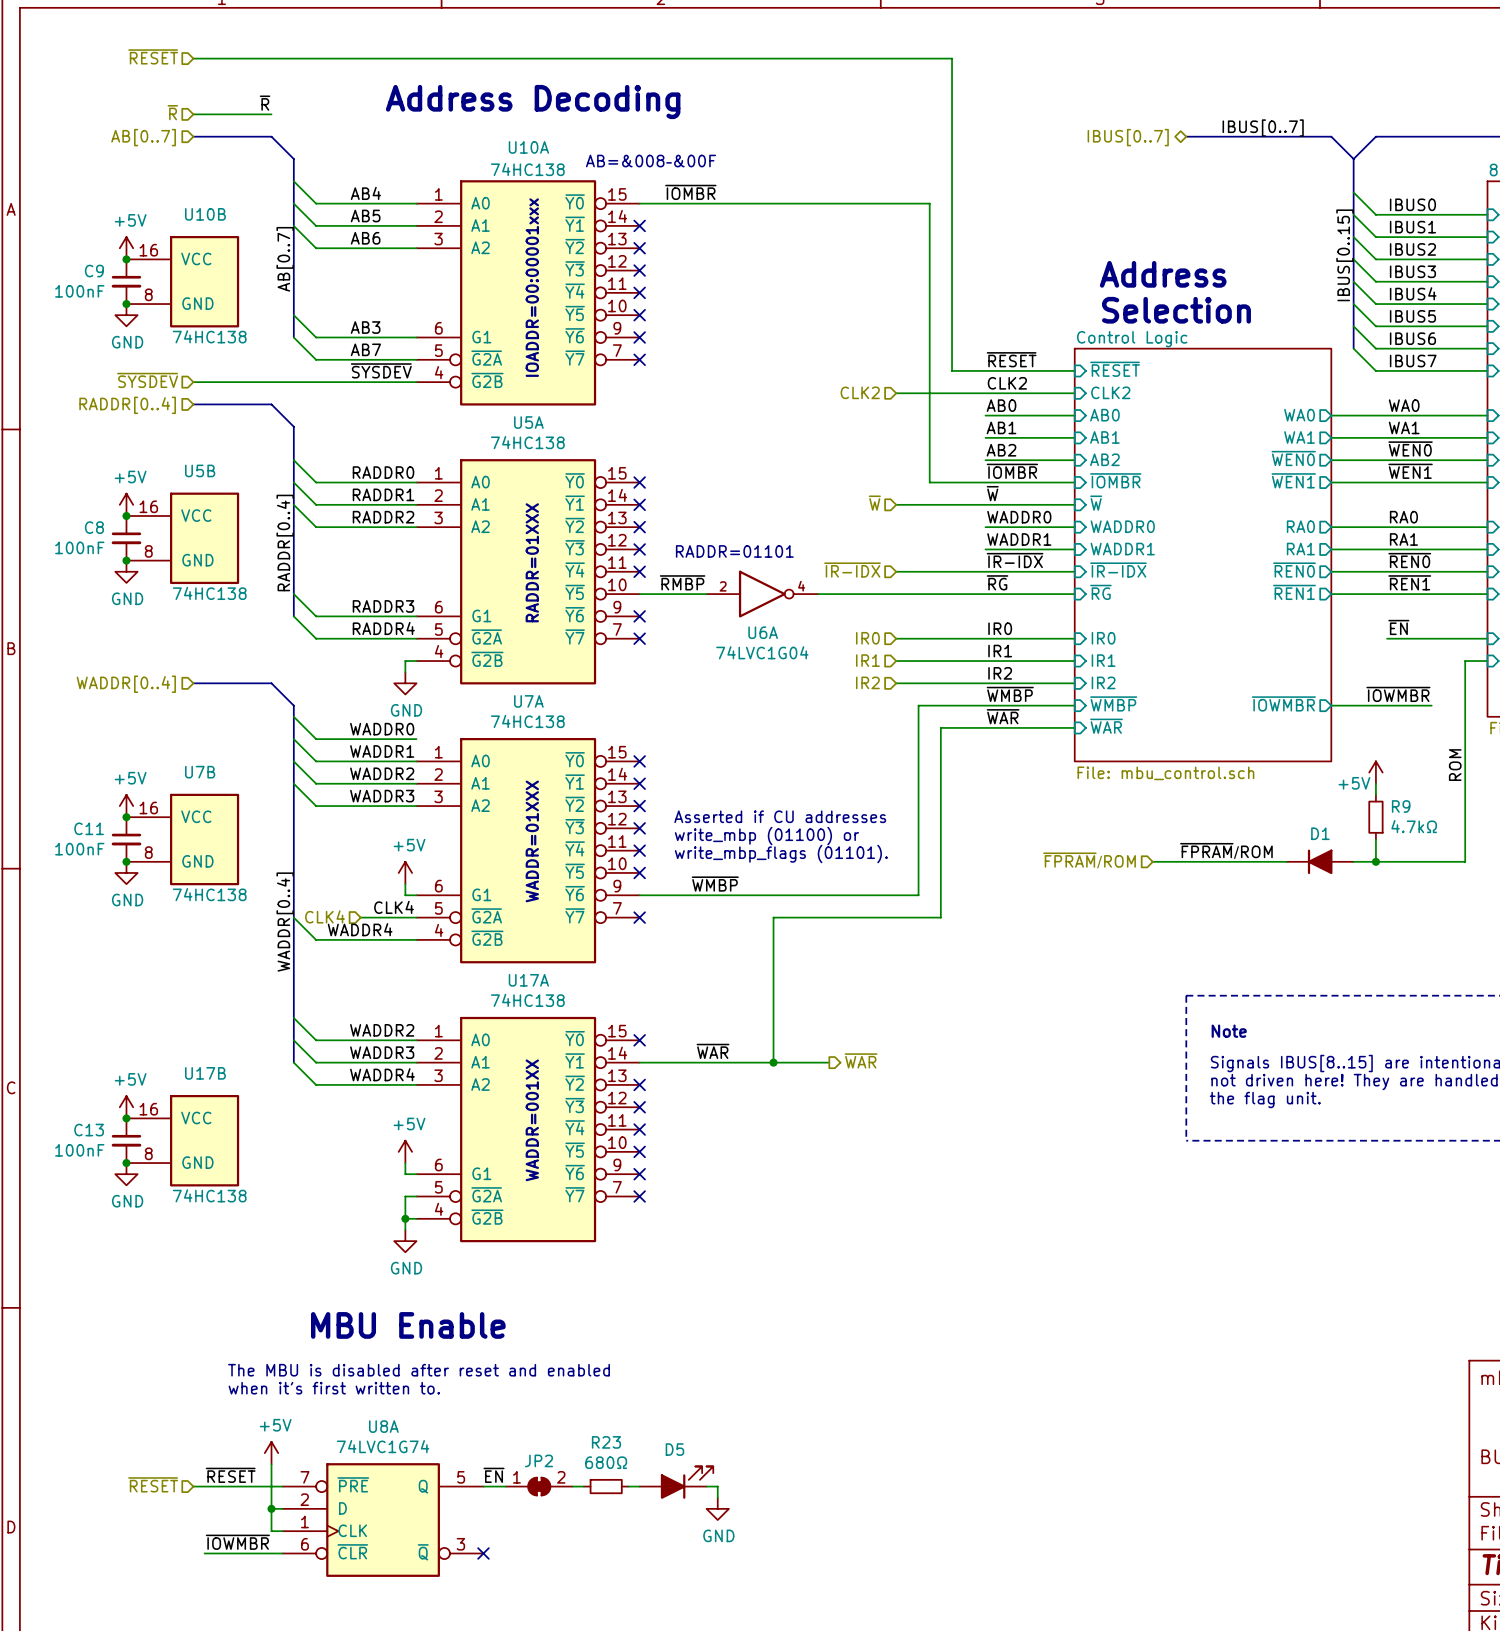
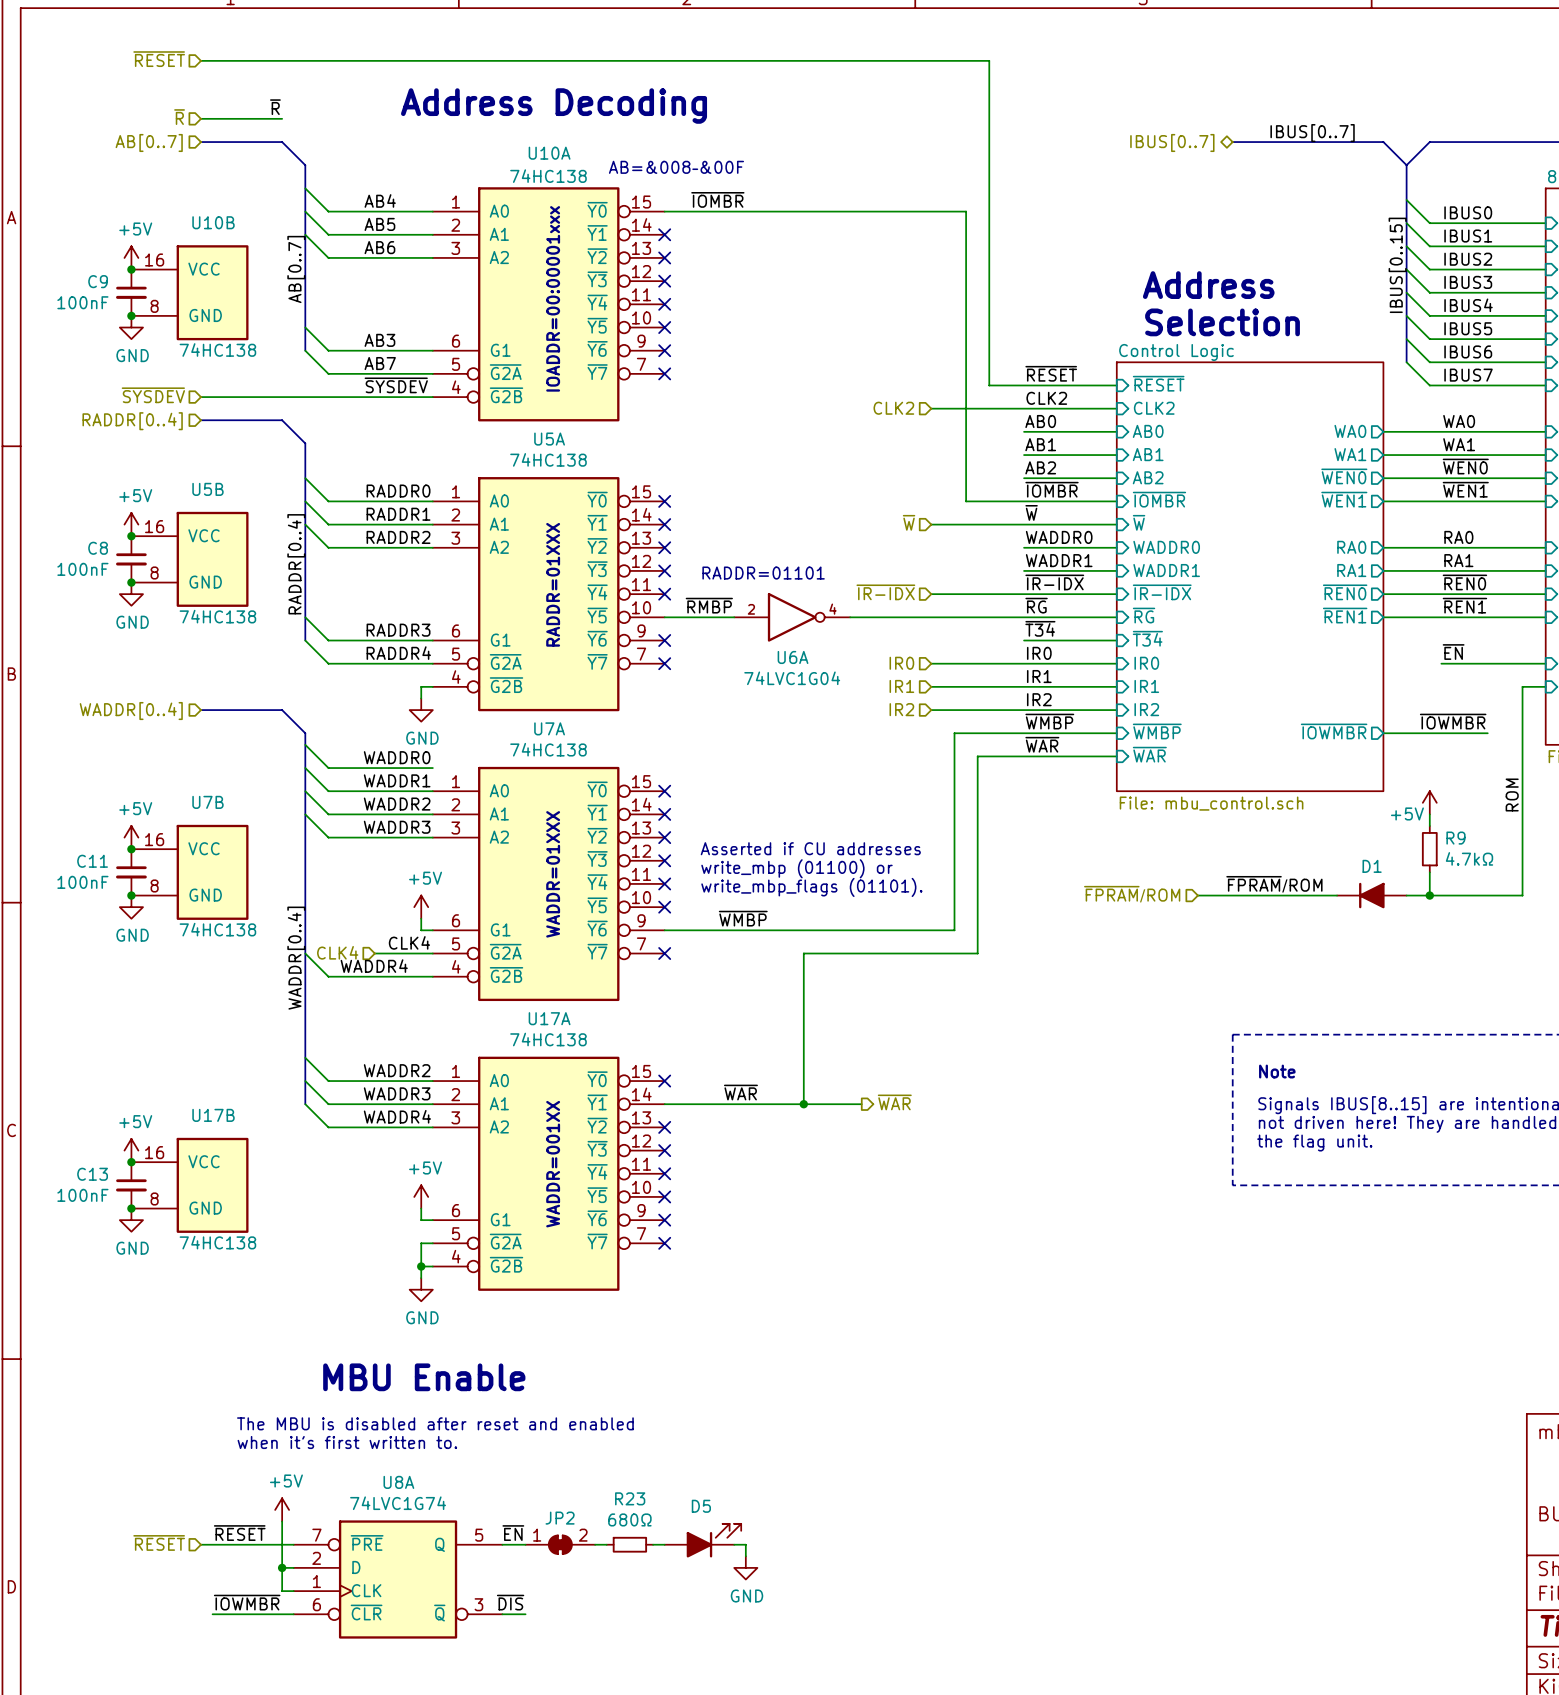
label: none -> ~{T34} (1040, 628)
sheet pin: none -> ~{T34} (1147, 638)
wire: none -> (1024, 640) (1116, 640)
label: none -> ~{DIS} (510, 1602)
wire: none -> (502, 1614) (525, 1614)
no-connect mark: (483, 1553) -> none

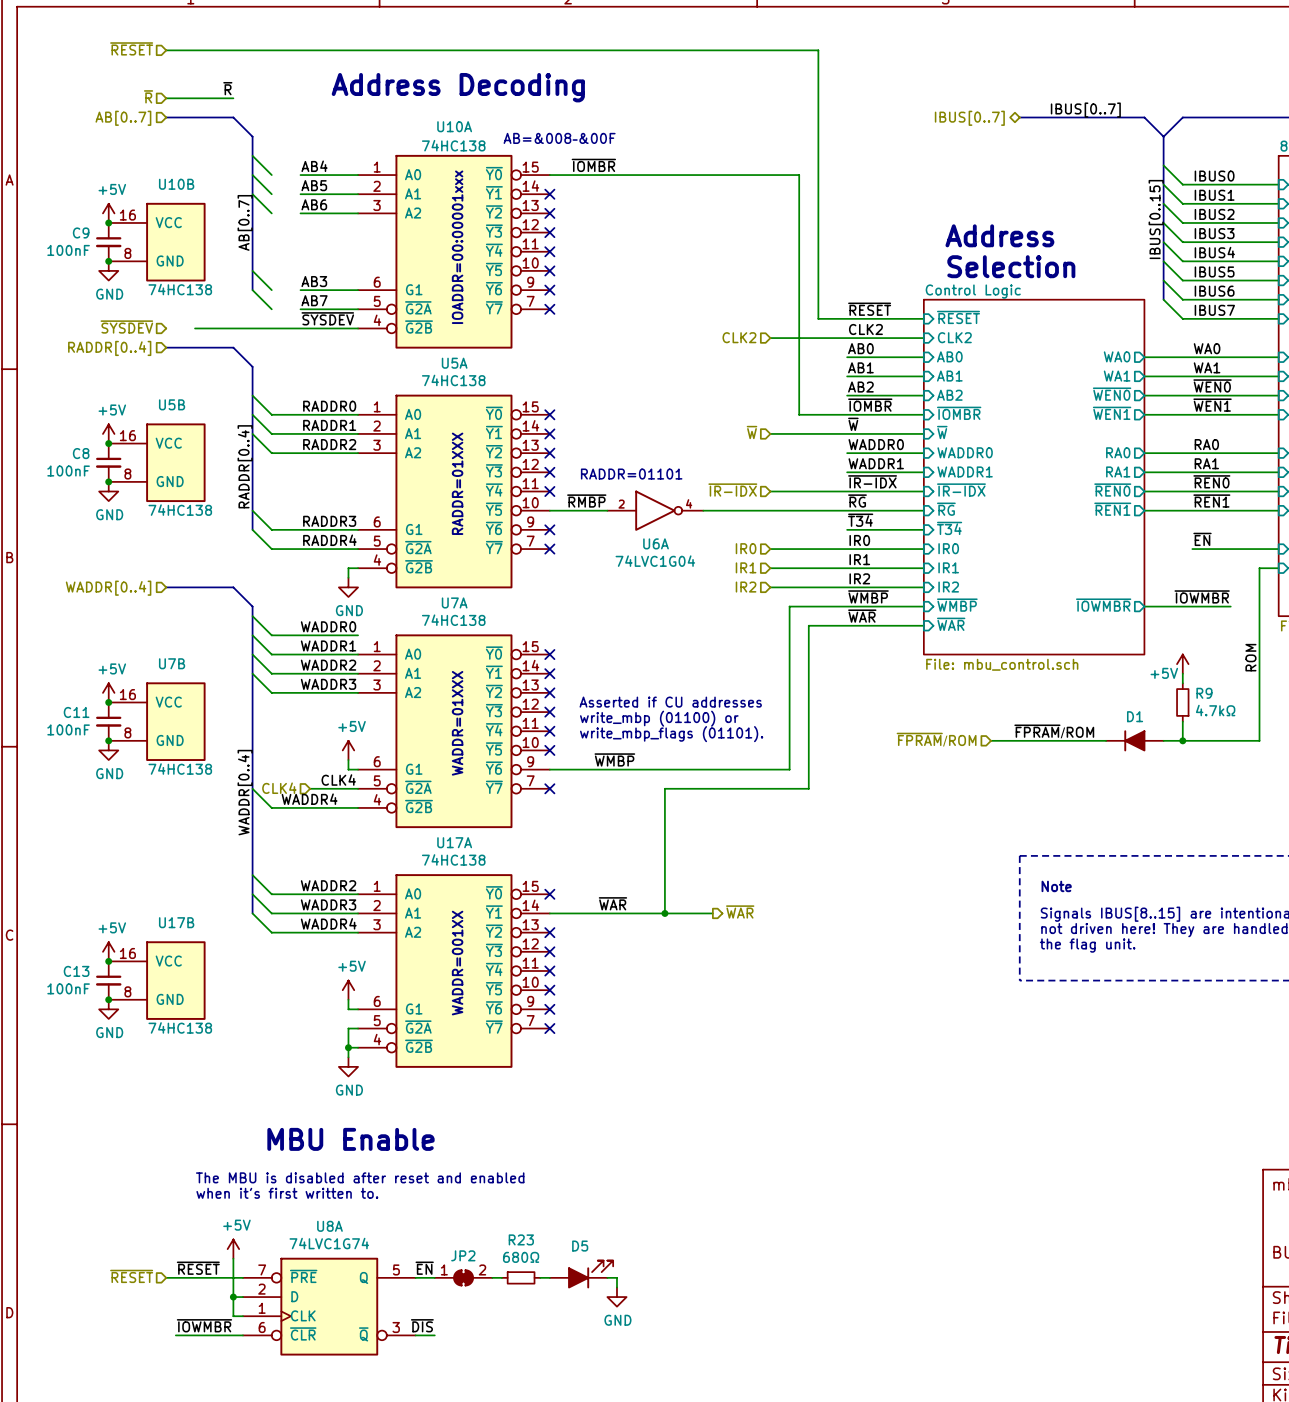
wire: (328, 211) (363, 211) -> none
wire: (328, 234) (363, 234) -> none
wire: (328, 257) (363, 257) -> none
wire: (328, 350) (363, 350) -> none
wire: (328, 373) (363, 373) -> none
wire: (200, 397) (235, 397) -> none

